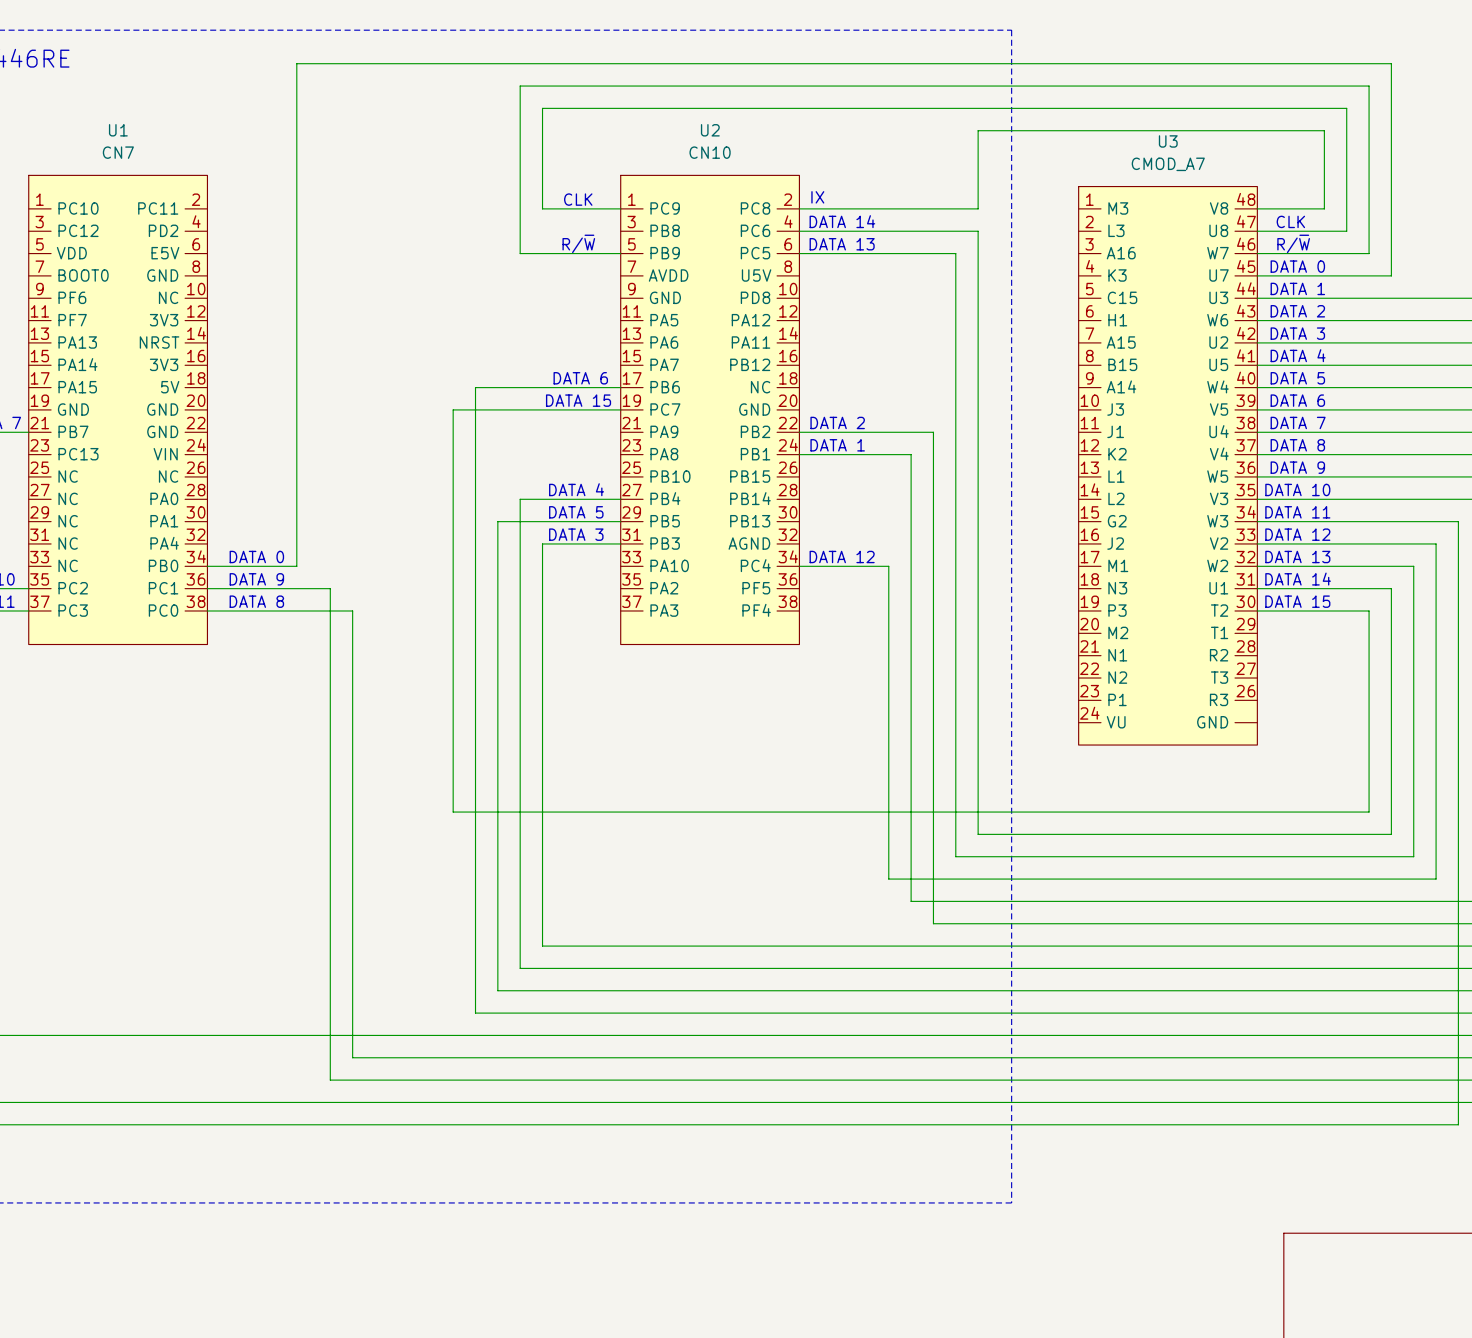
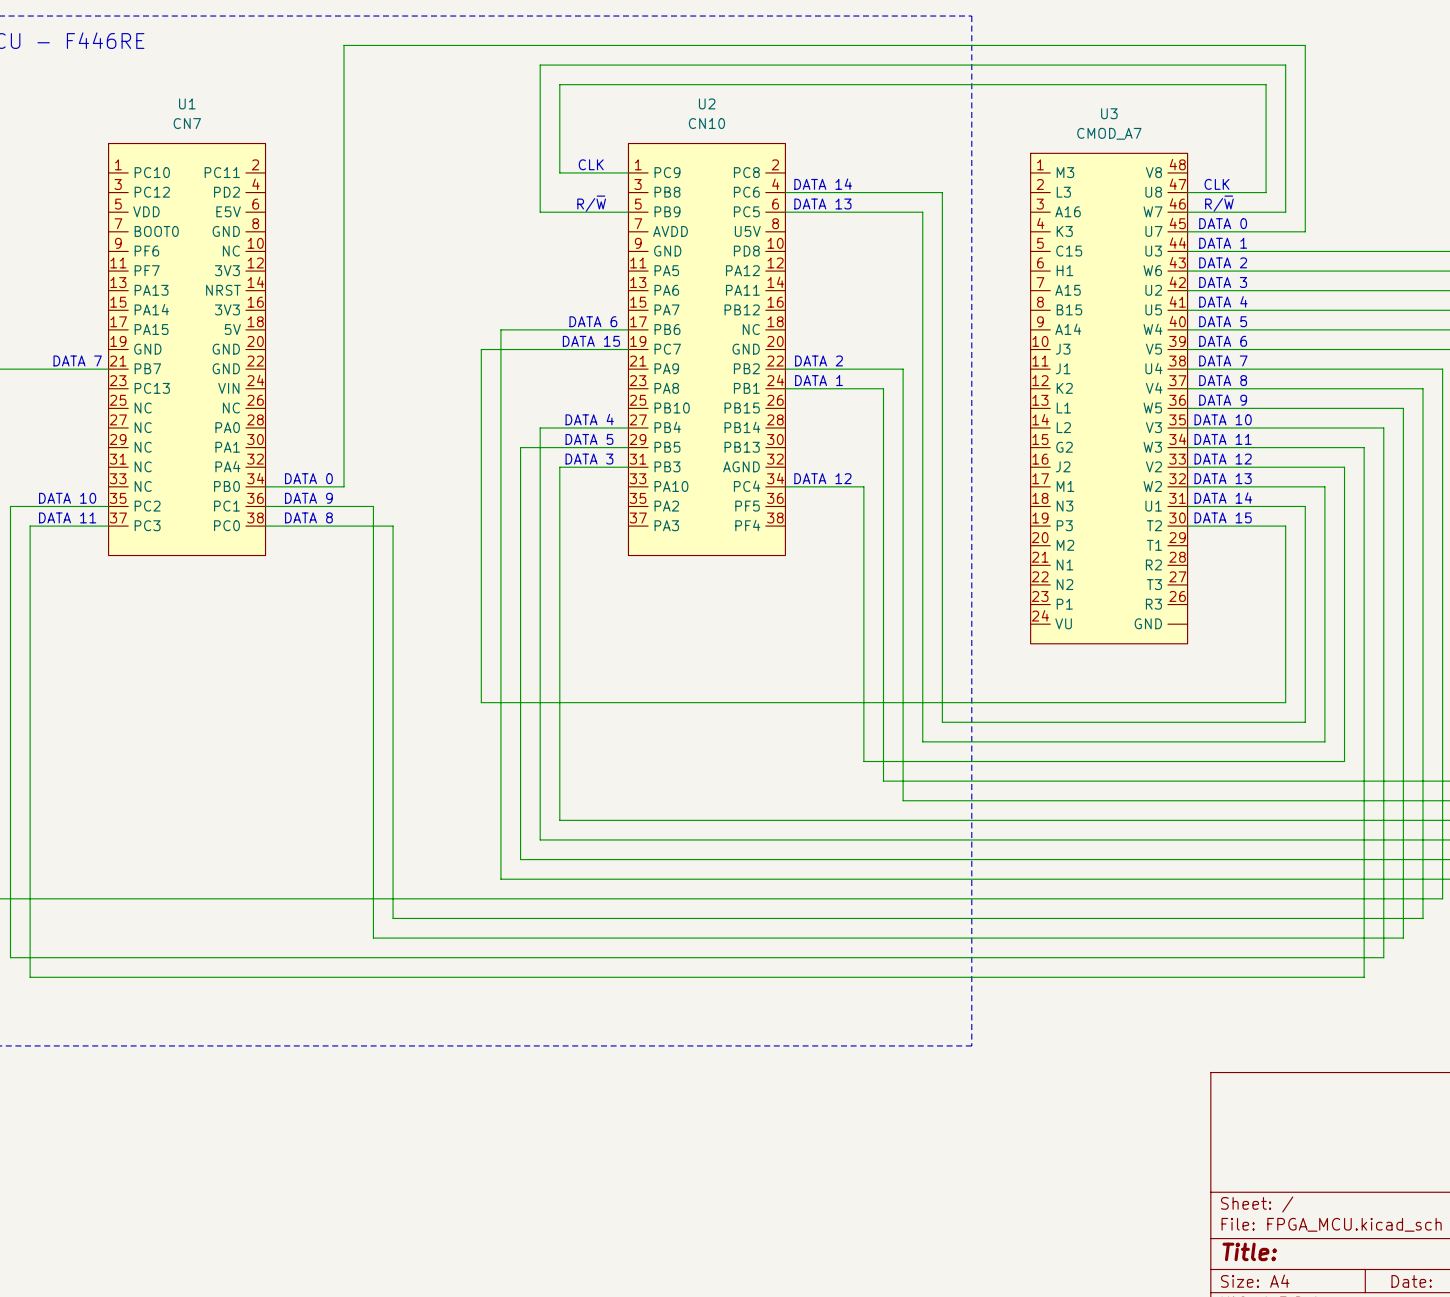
text: IX (817, 197) -> none
wire: (799, 208) (978, 208) (978, 130) (1324, 130) (1324, 208) (1257, 208) -> none

